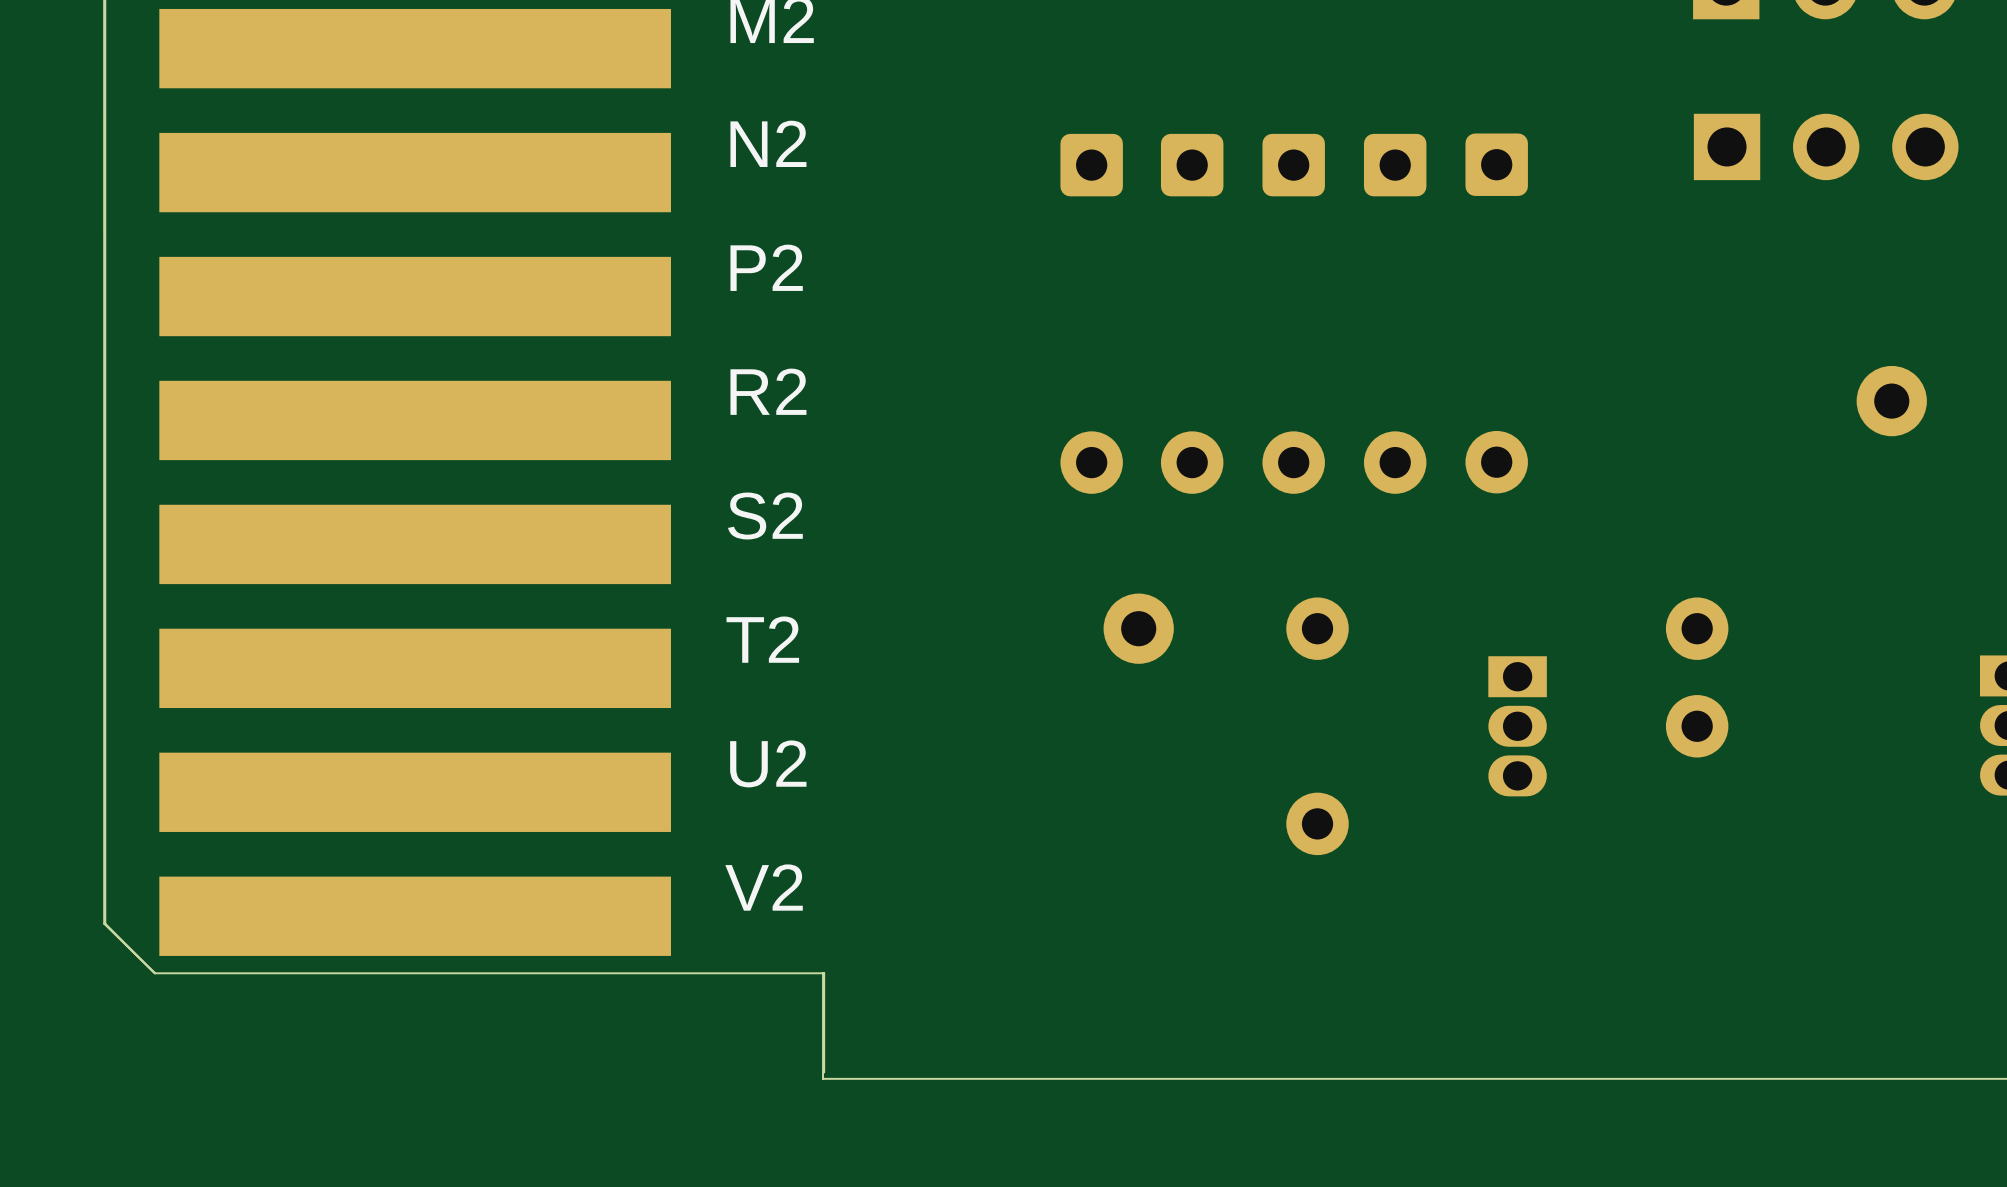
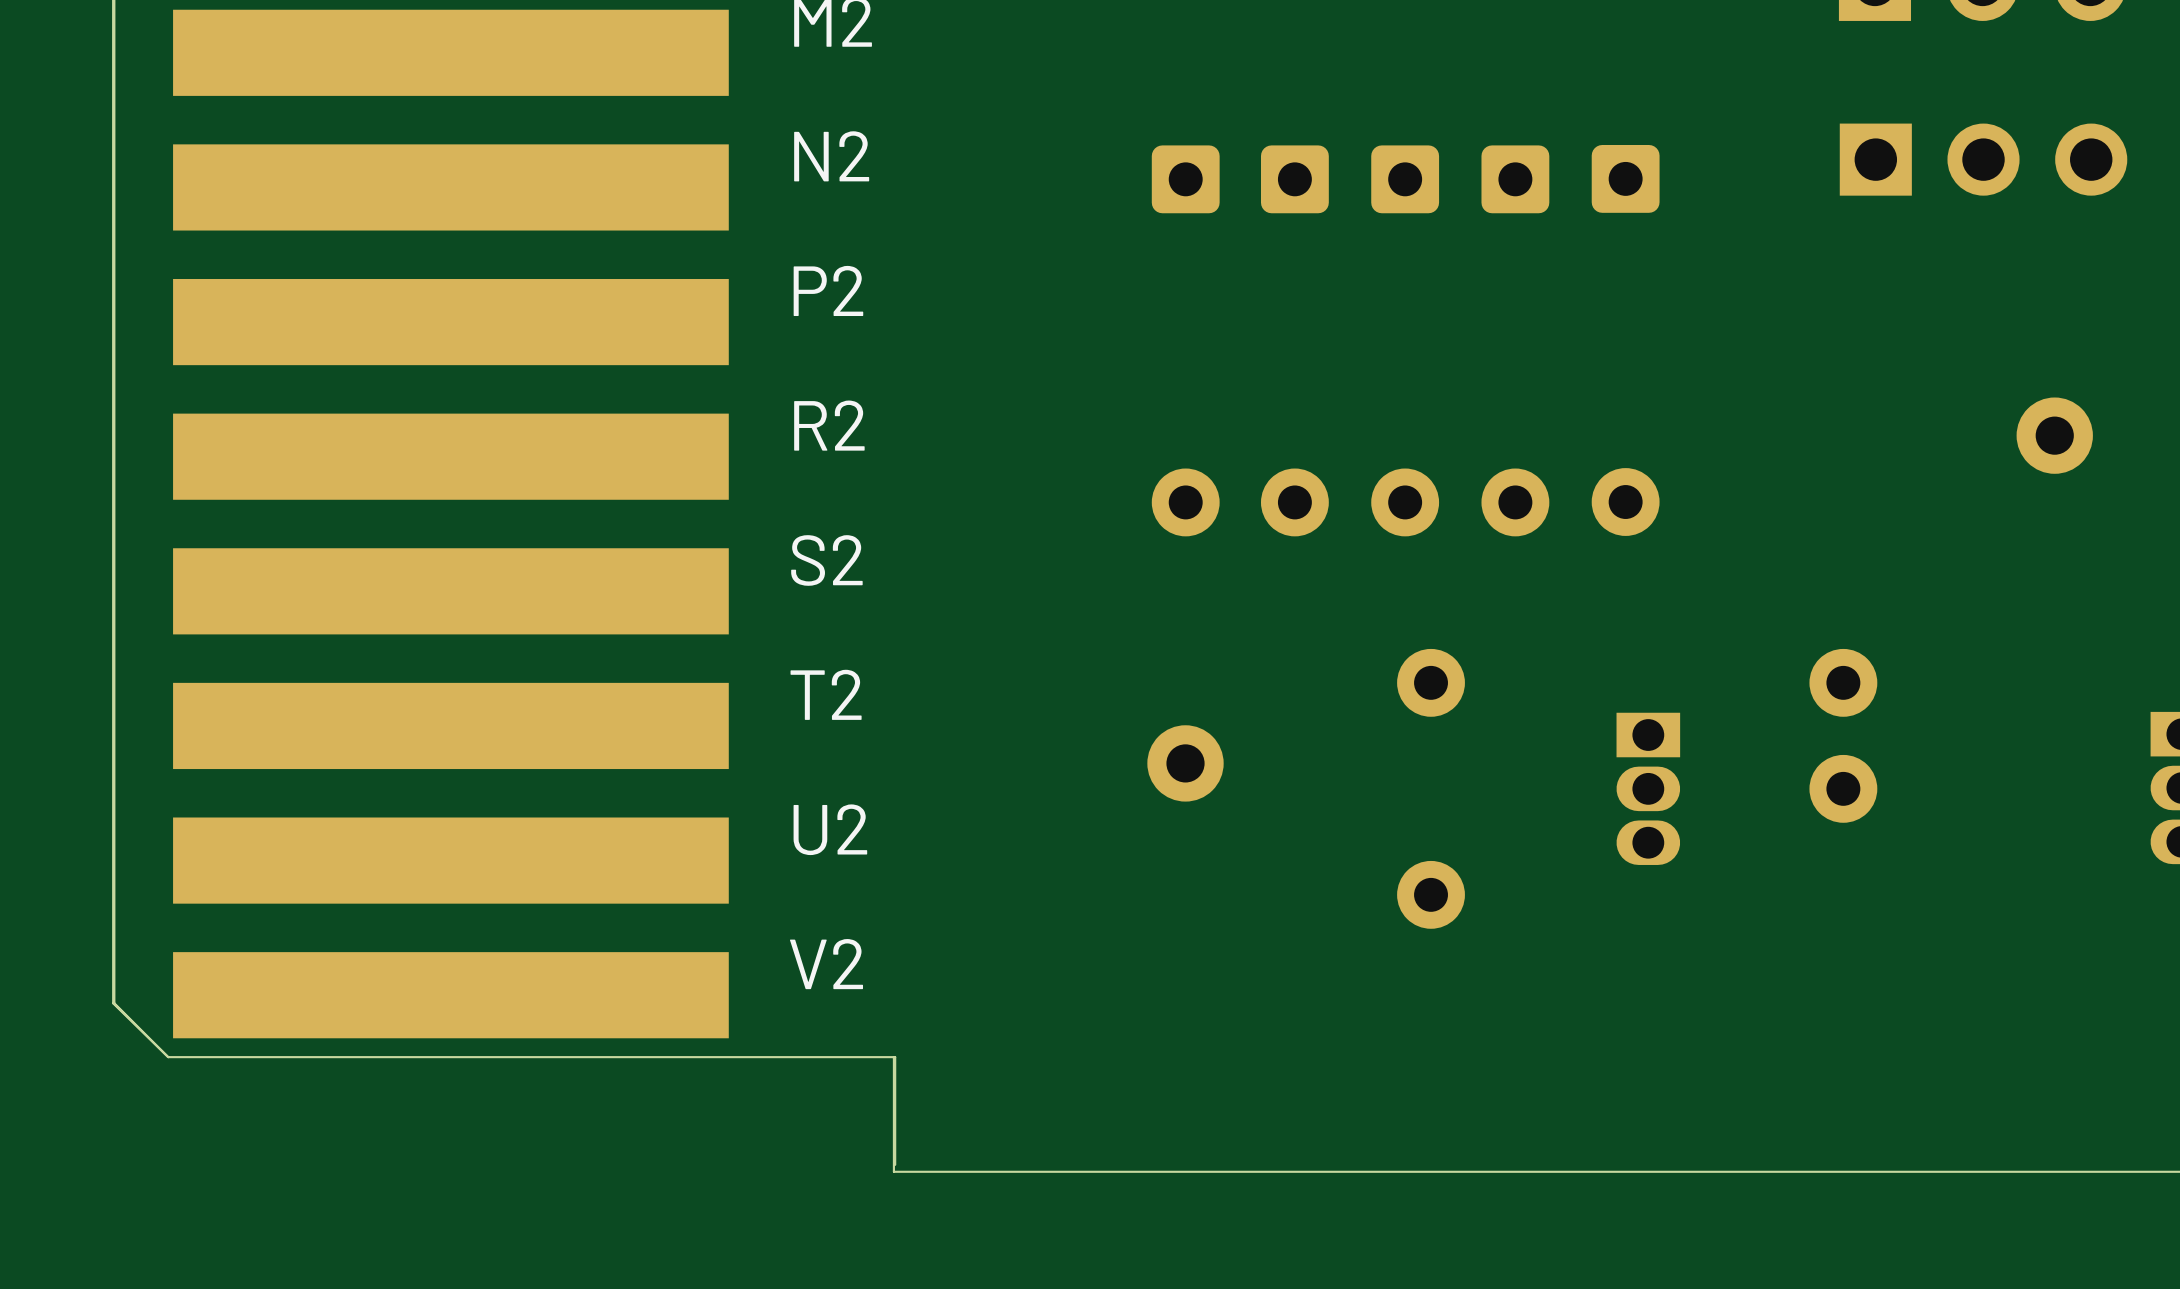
part position: (1138, 628) -> (1185, 763)

